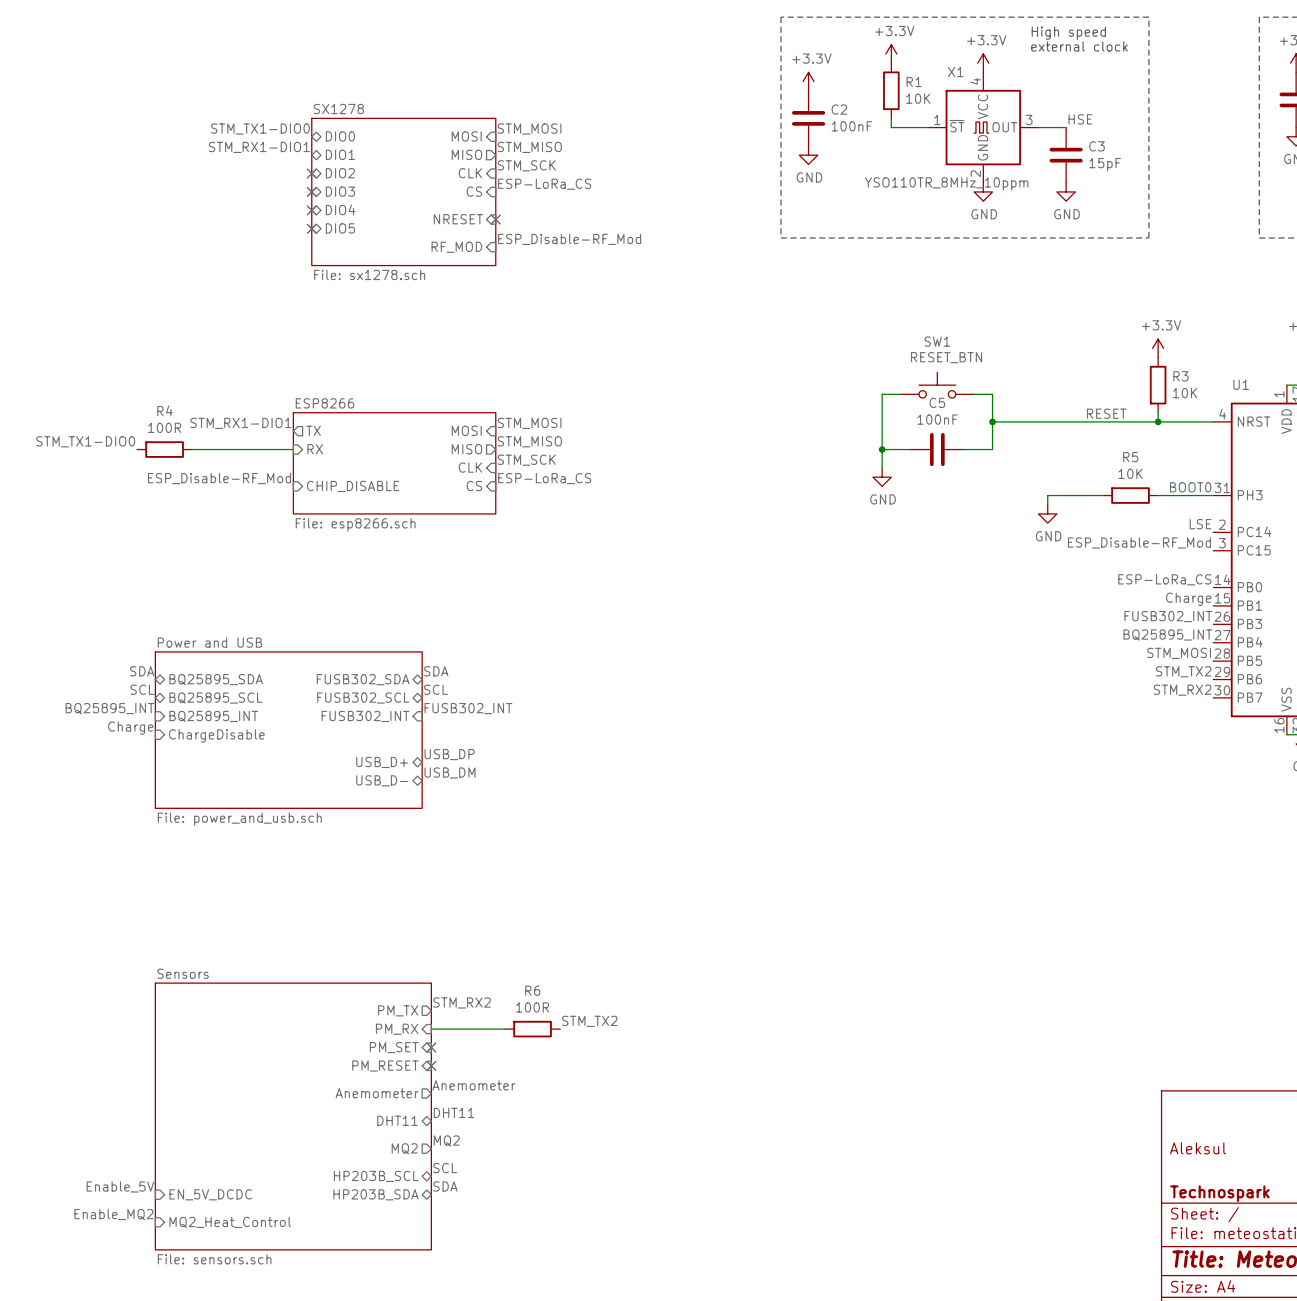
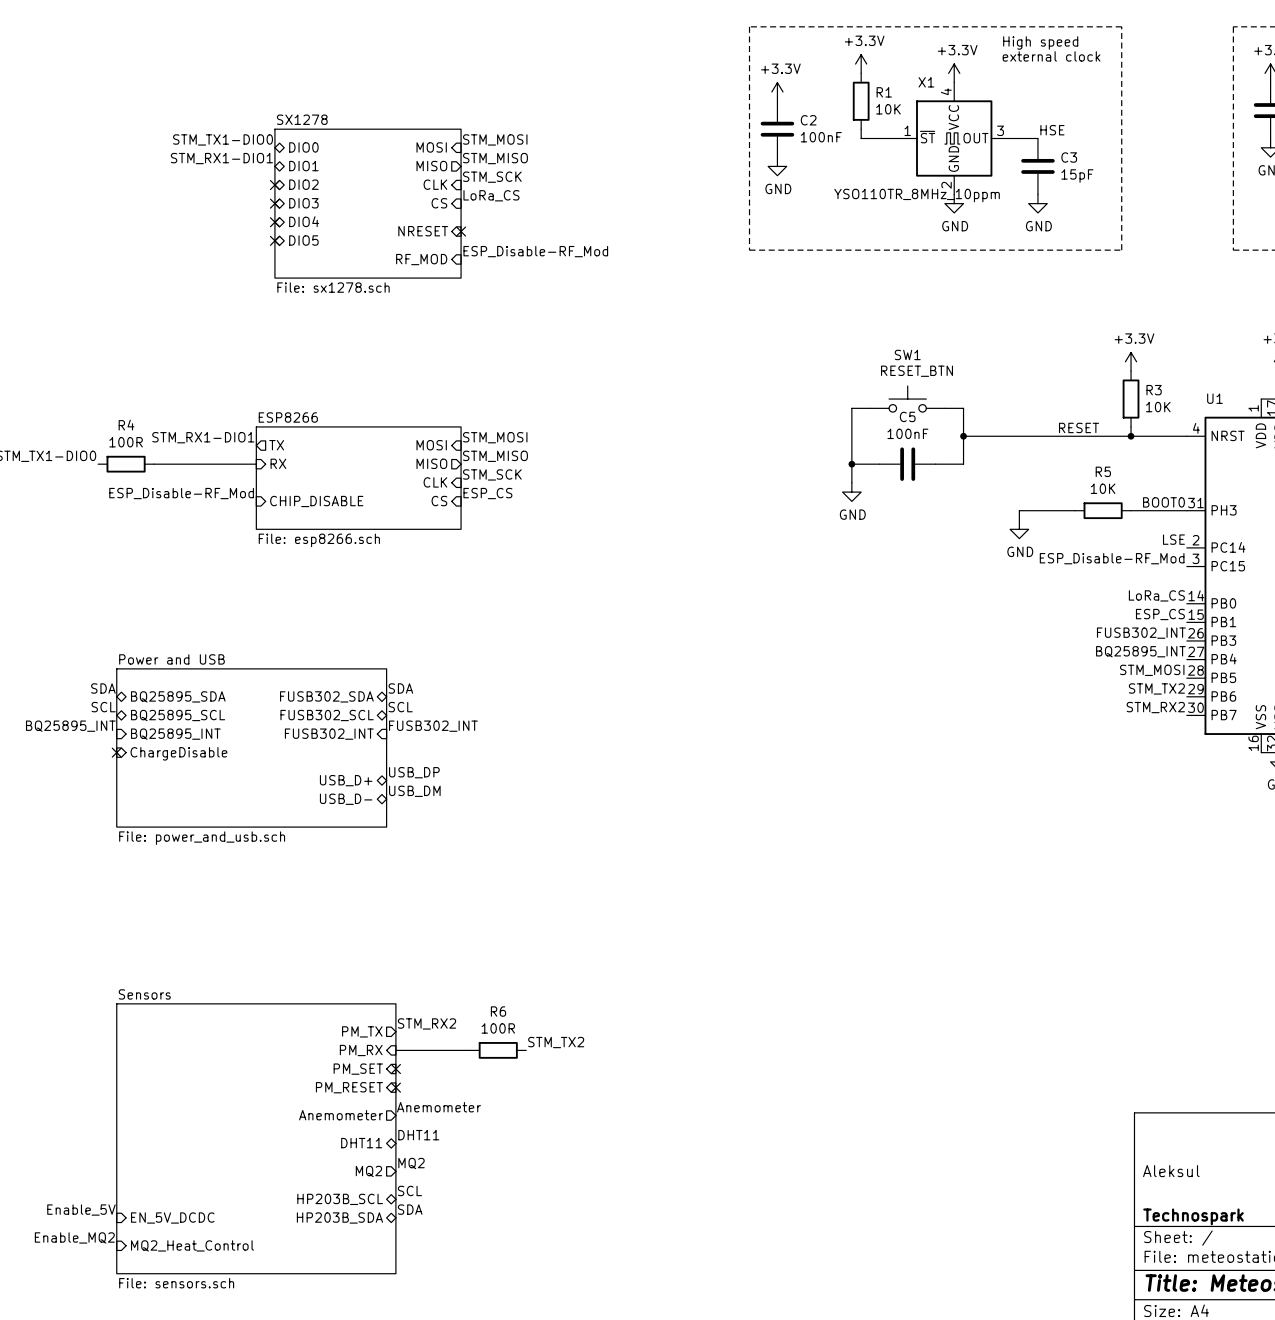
label: ESP-LoRa_CS (544, 184) -> LoRa_CS (491, 195)
label: ESP-LoRa_CS (544, 478) -> ESP_CS (487, 493)
label: ESP-LoRa_CS (1164, 579) -> LoRa_CS (1156, 595)
label: Charge (1188, 599) -> ESP_CS (1160, 614)
label: Charge (130, 728) -> none
no-connect mark: none -> (116, 752)

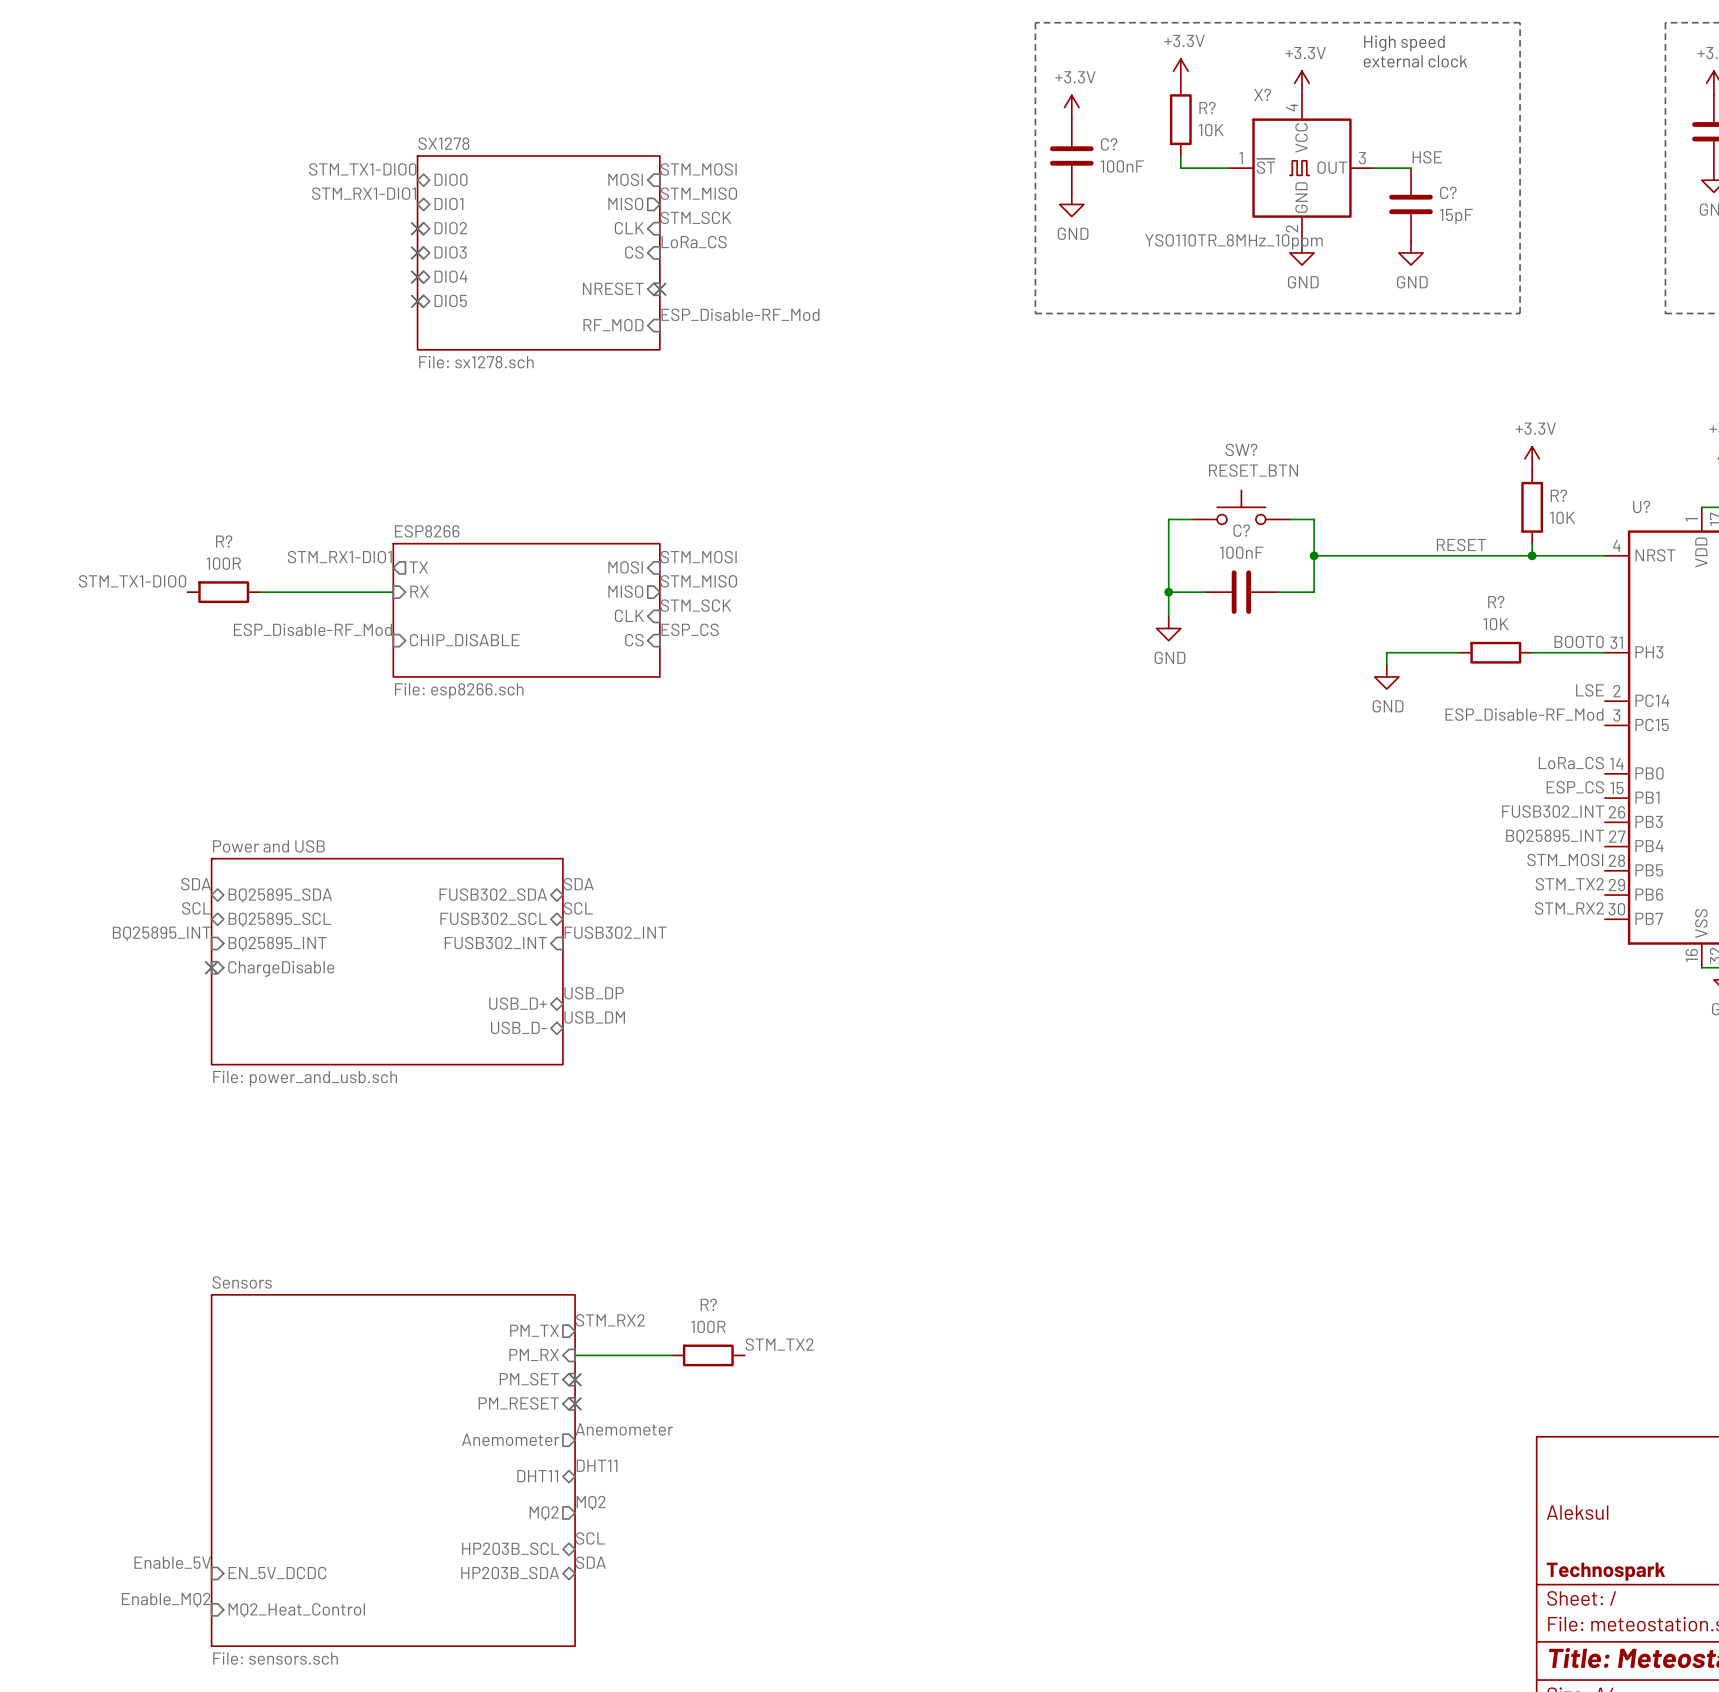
X1 name: X1 (926, 82) -> X? (1262, 94)
R1 name: R1 (884, 92) -> R? (1207, 107)
C2 name: C2 (808, 120) -> C? (1109, 144)
C3 name: C3 (1069, 157) -> C? (1448, 192)
SW1 name: SW1 (907, 354) -> SW? (1241, 449)
R3 name: R3 (1154, 390) -> R? (1558, 495)
U1 name: U1 (1214, 398) -> U? (1641, 506)
C5 name: C5 (907, 416) -> C? (1241, 530)
R4 name: R4 (126, 425) -> R? (224, 541)
R5 name: R5 (1103, 471) -> R? (1496, 602)
R6 name: R6 (498, 1011) -> R? (708, 1304)

